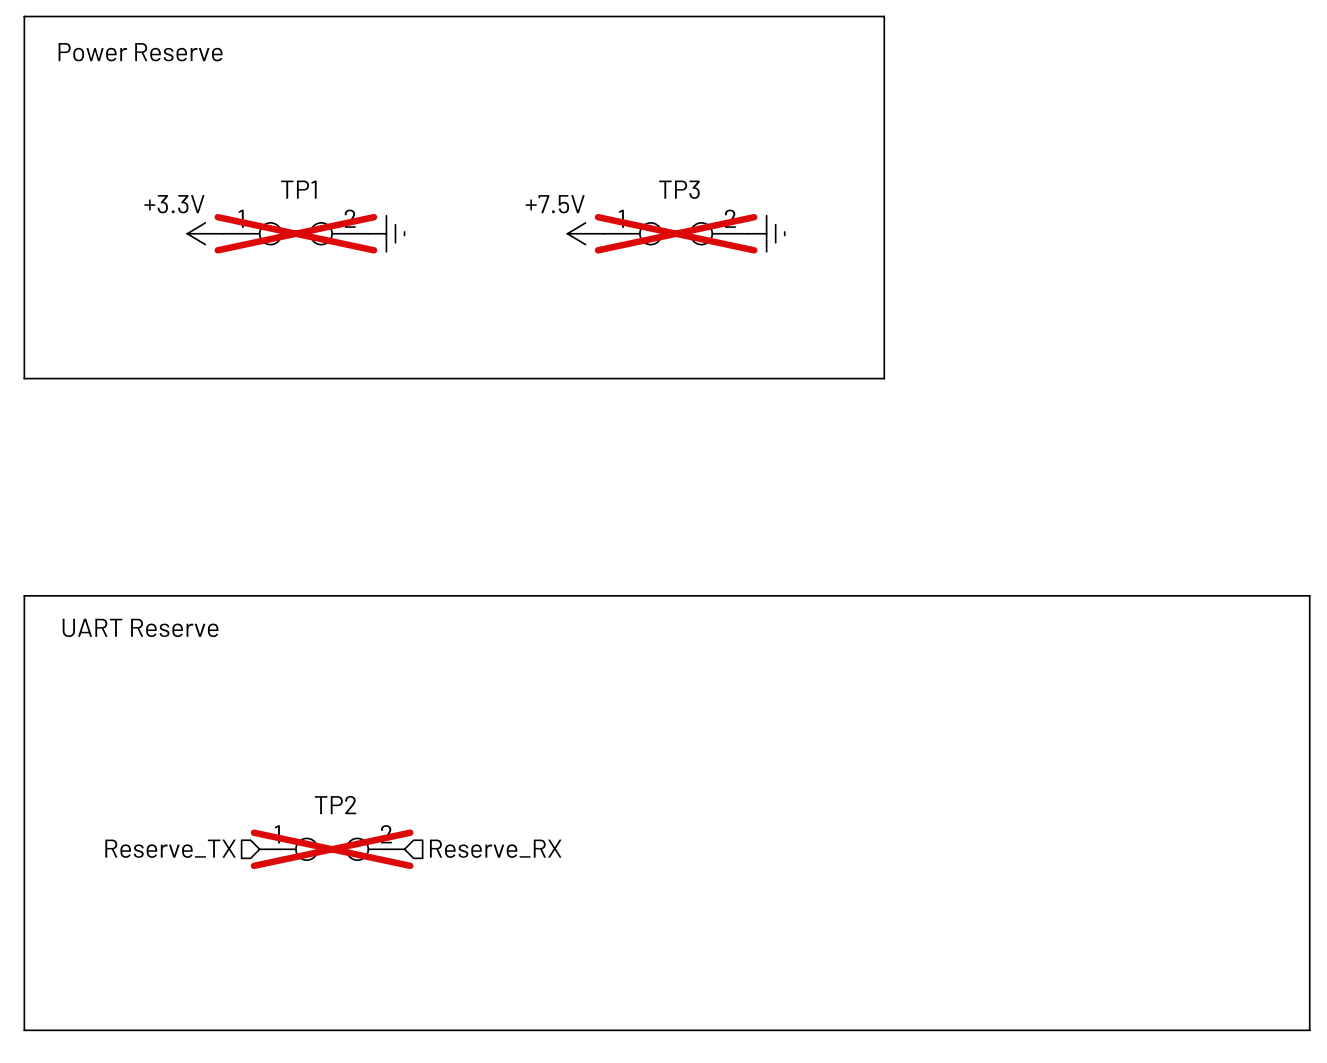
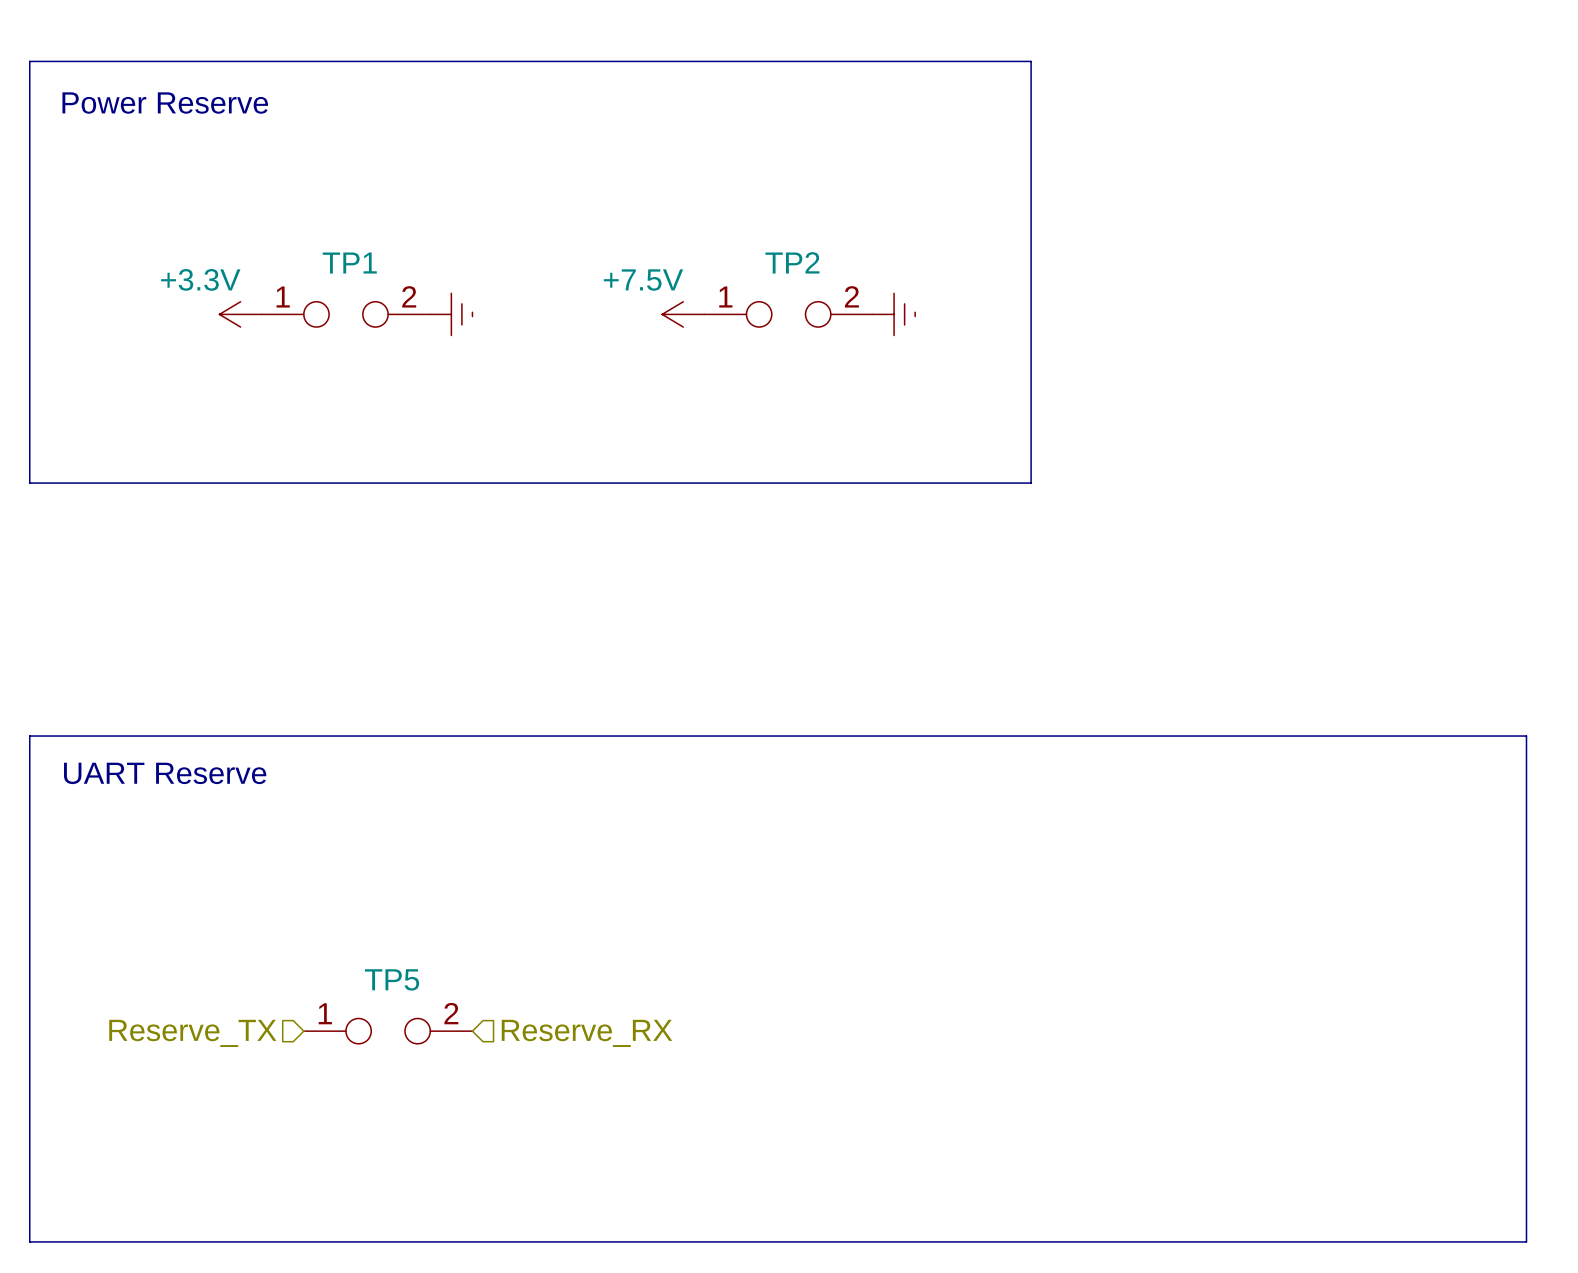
TP3 name: TP3 (679, 189) -> TP2 (792, 262)
TP1 do-not-place cross: (295, 233) -> none
TP3 do-not-place cross: (676, 233) -> none
TP2 name: TP2 (335, 805) -> TP5 (392, 979)
TP2 do-not-place cross: (332, 849) -> none

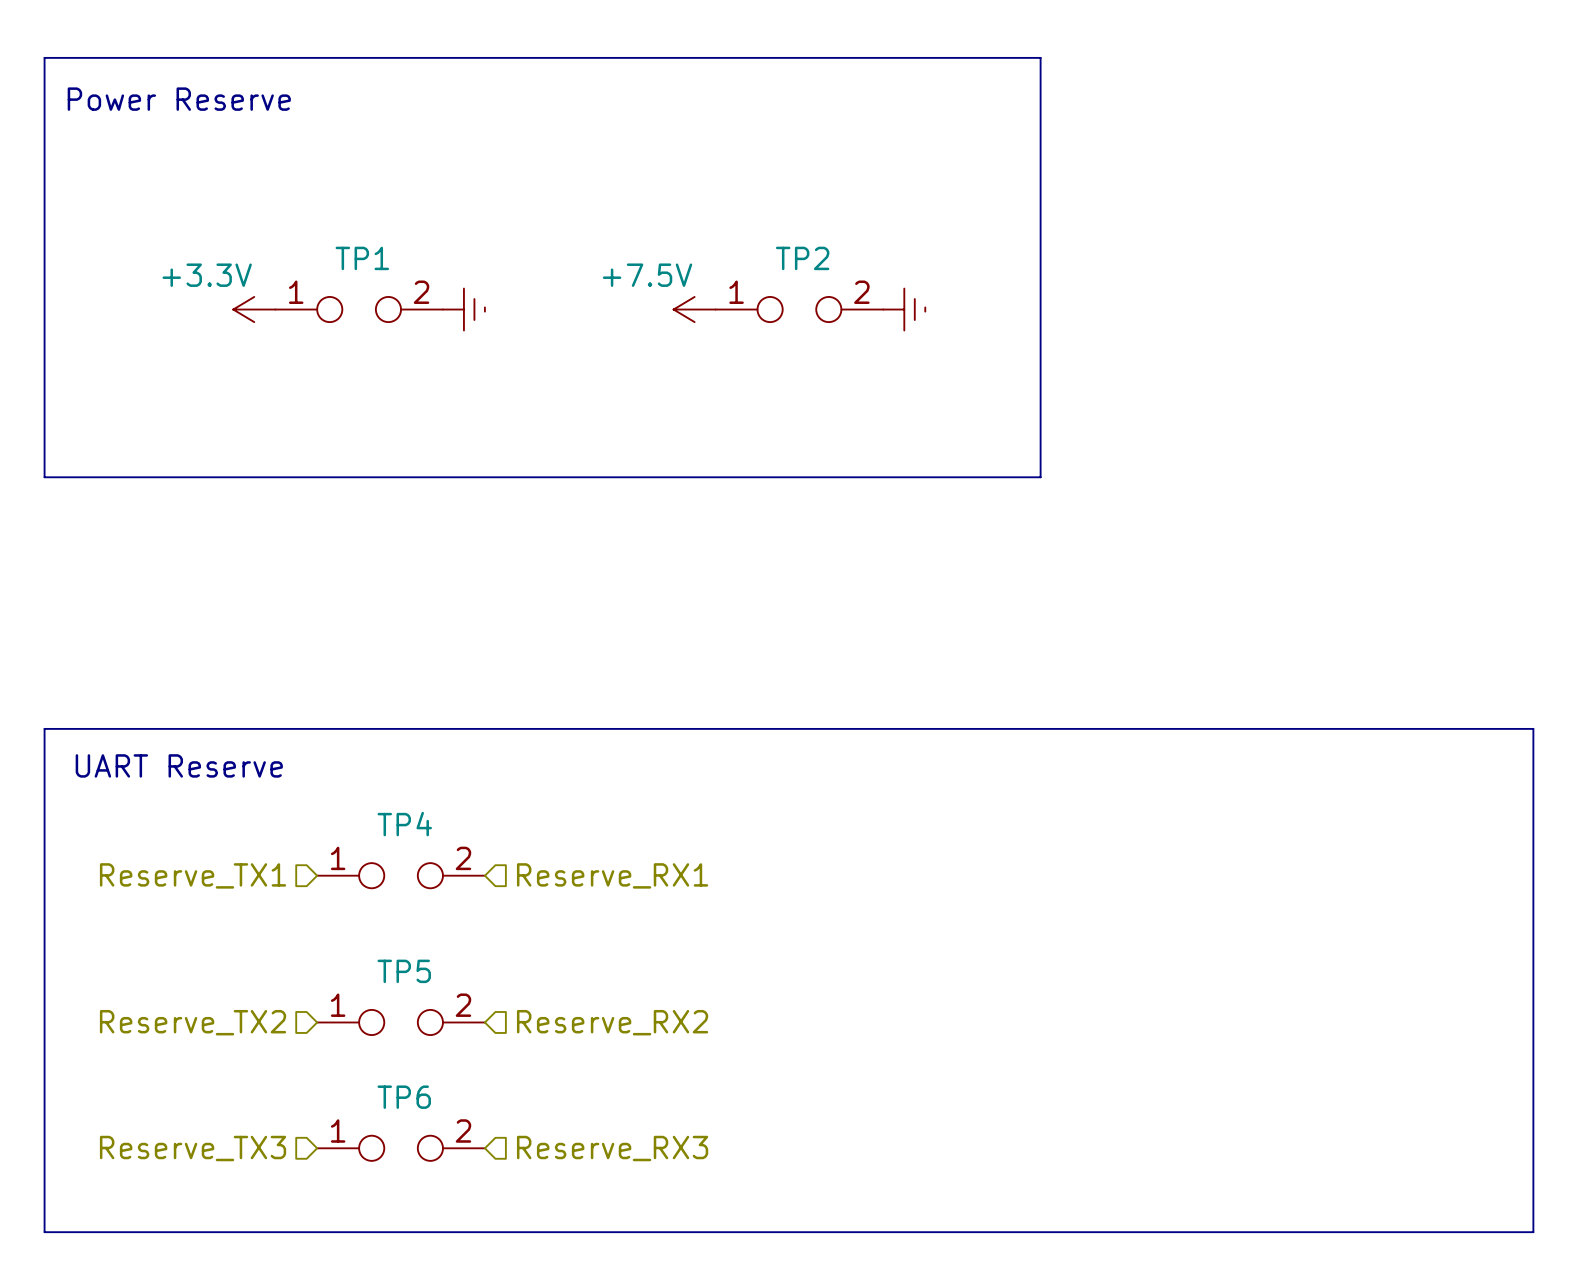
TP4: none -> (401, 875)
hierarchical label: none -> Reserve_TX1 (193, 875)
hierarchical label: none -> Reserve_RX1 (612, 875)
hierarchical label: Reserve_TX (192, 1033) -> Reserve_TX2 (193, 1022)
hierarchical label: Reserve_RX (587, 1033) -> Reserve_RX2 (612, 1022)
TP6: none -> (401, 1148)
hierarchical label: none -> Reserve_TX3 (193, 1148)
hierarchical label: none -> Reserve_RX3 (612, 1148)

